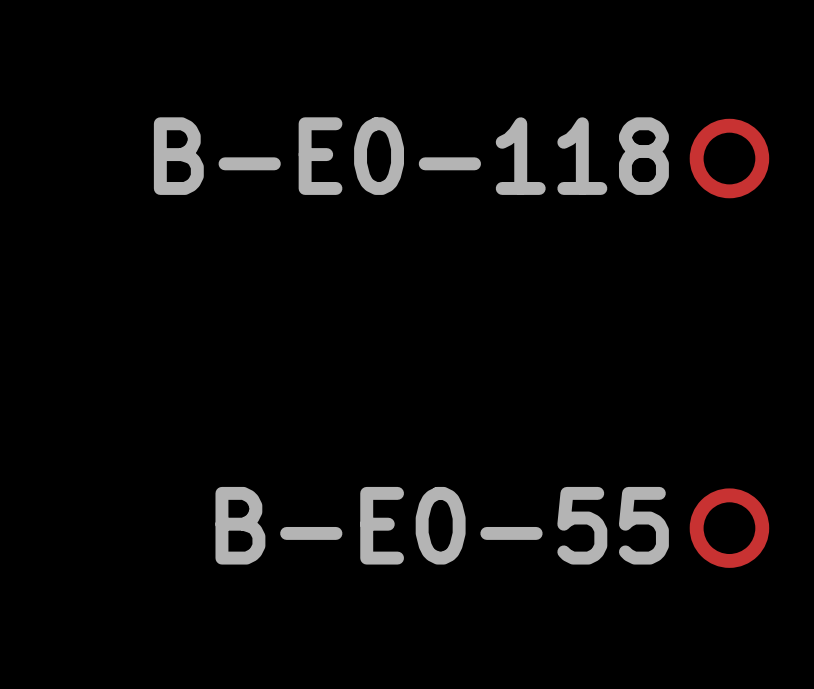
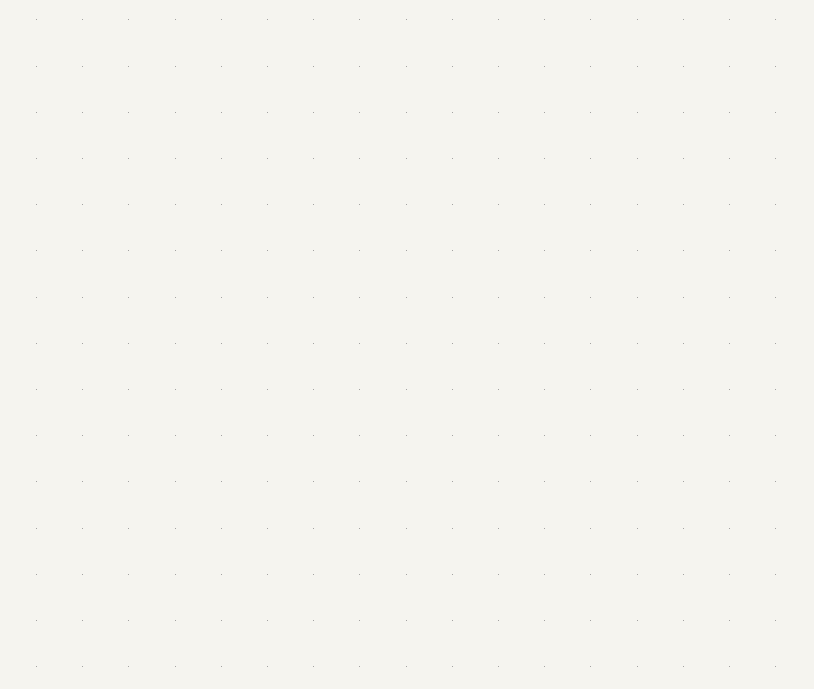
part: (729, 158) -> none
part: (729, 528) -> none

